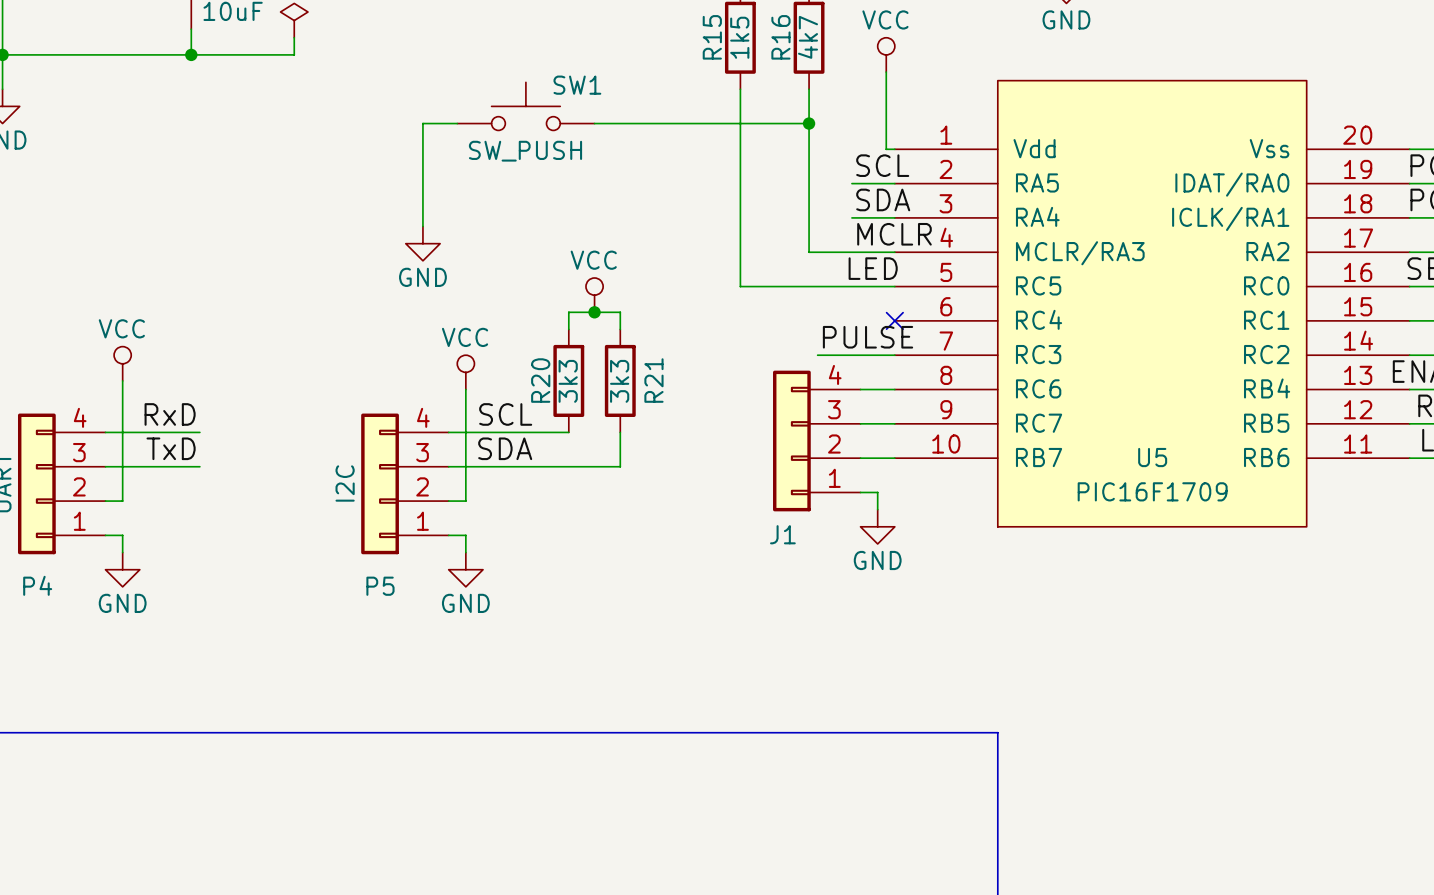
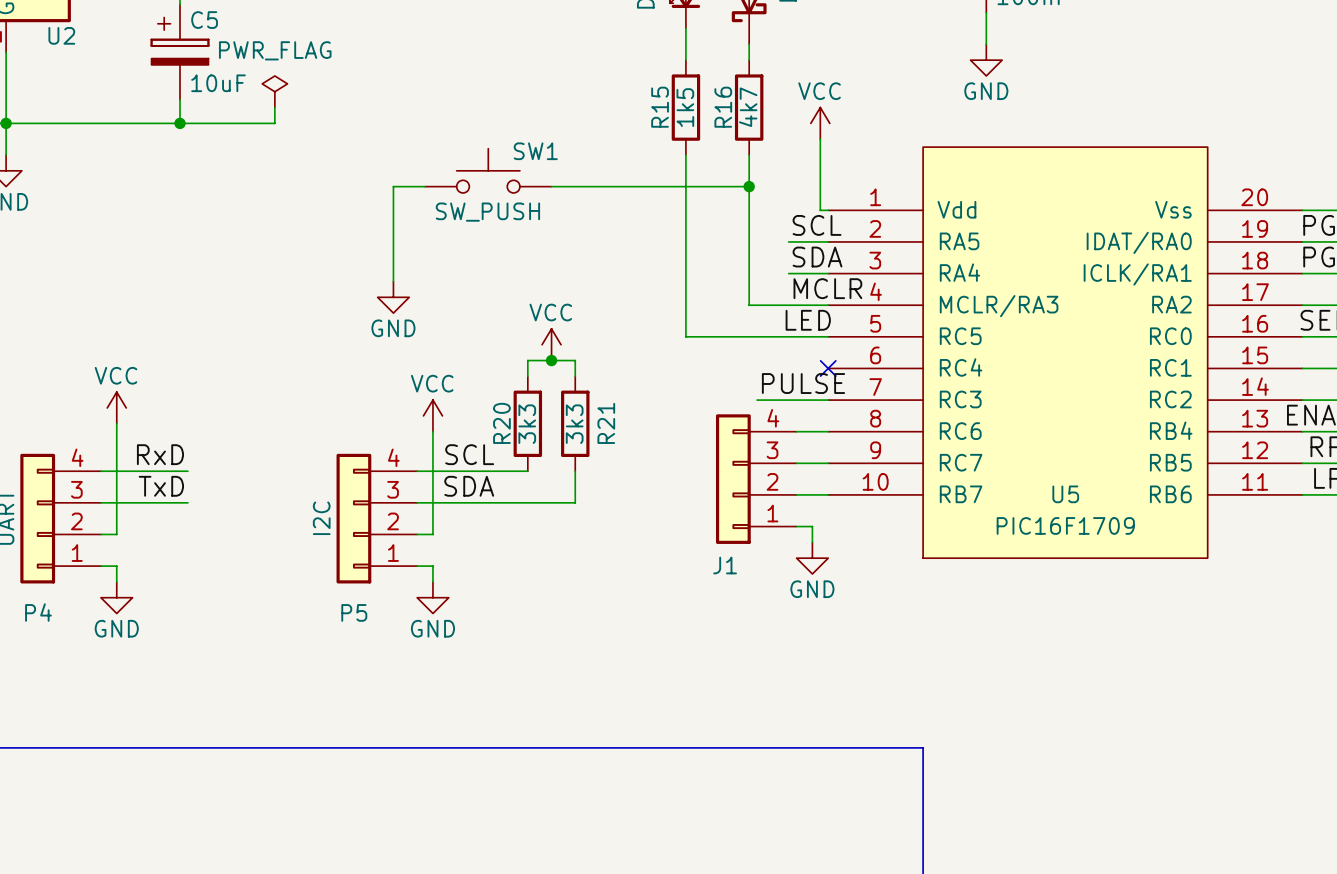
power symbol shape: [877, 37, 895, 73] -> [810, 107, 830, 140]
power symbol shape: [585, 277, 604, 313] -> [542, 328, 562, 361]
power symbol shape: [114, 346, 132, 381] -> [107, 392, 127, 424]
power symbol shape: [457, 355, 475, 390] -> [423, 400, 443, 432]

